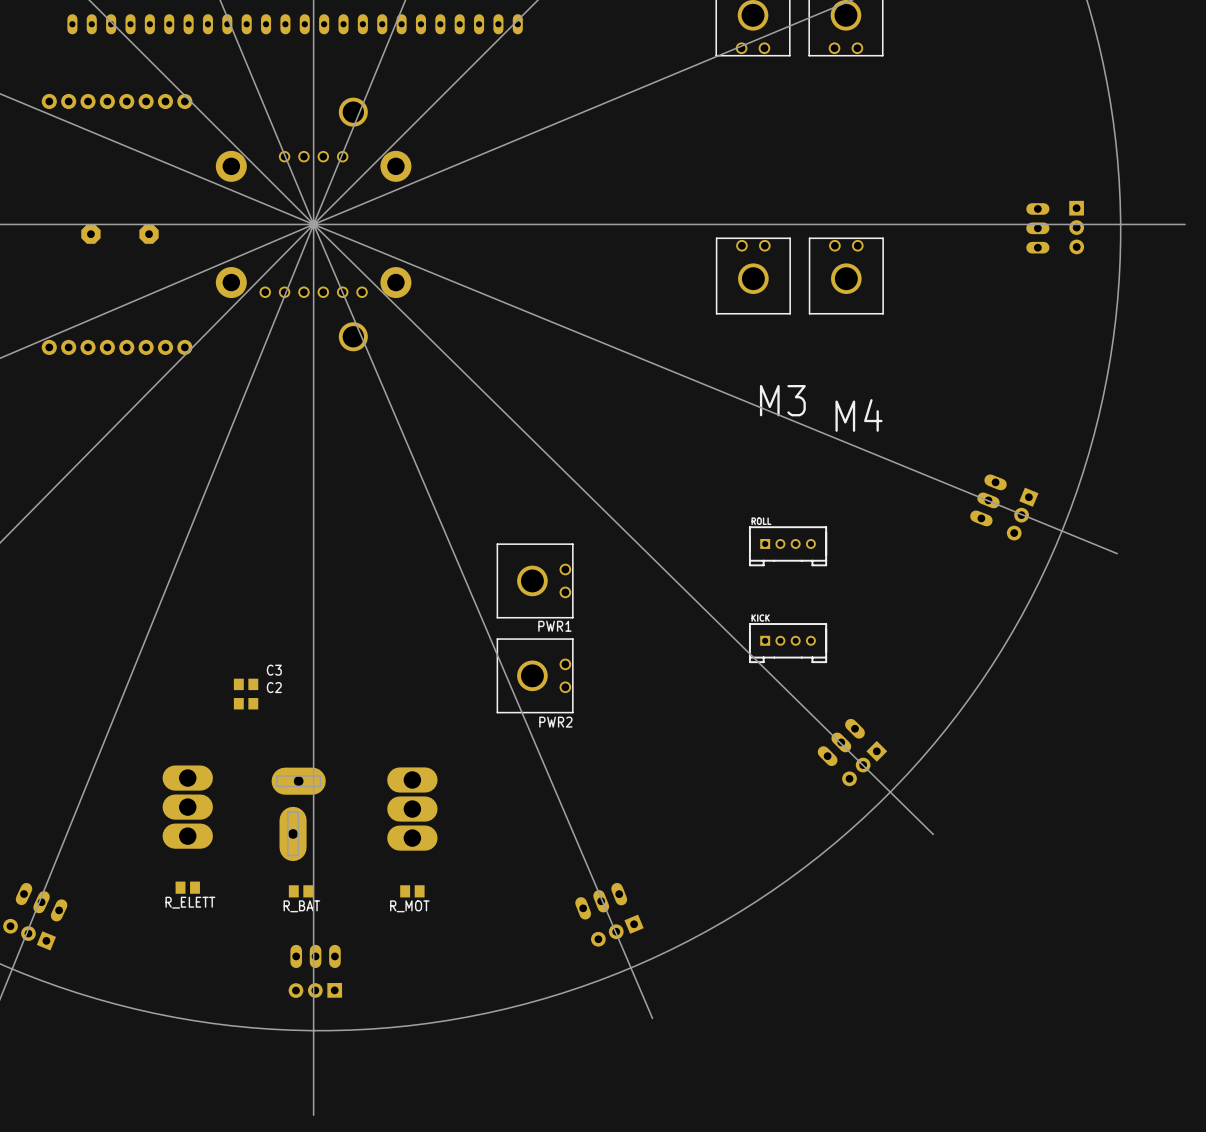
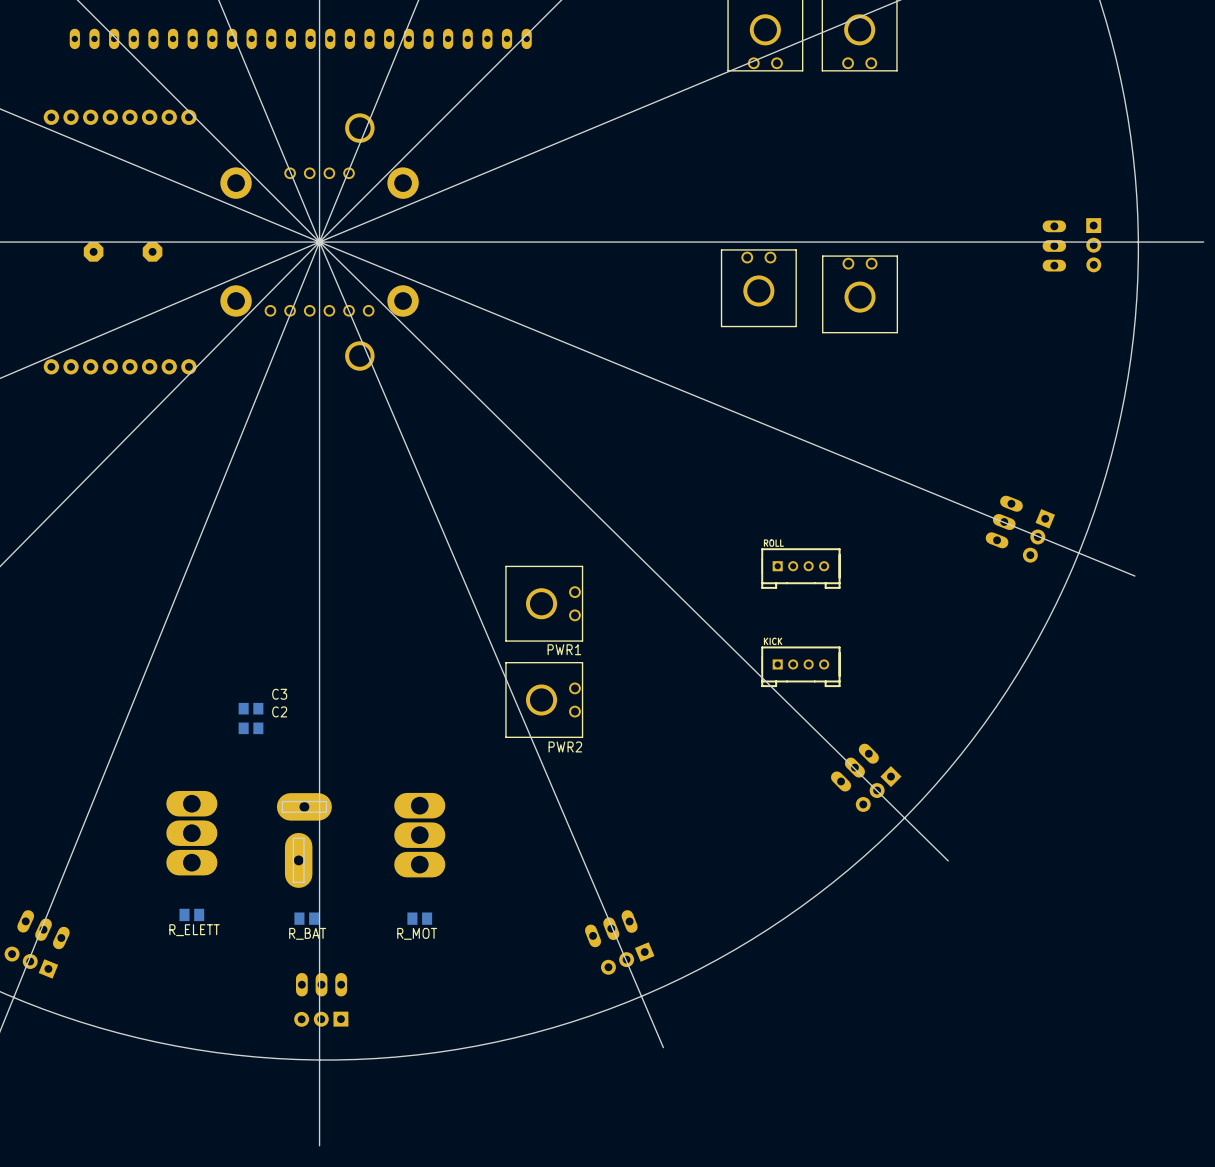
part: none -> (758, 288)
M3: (753, 276) -> none
M4 name: M4 (859, 415) -> none

